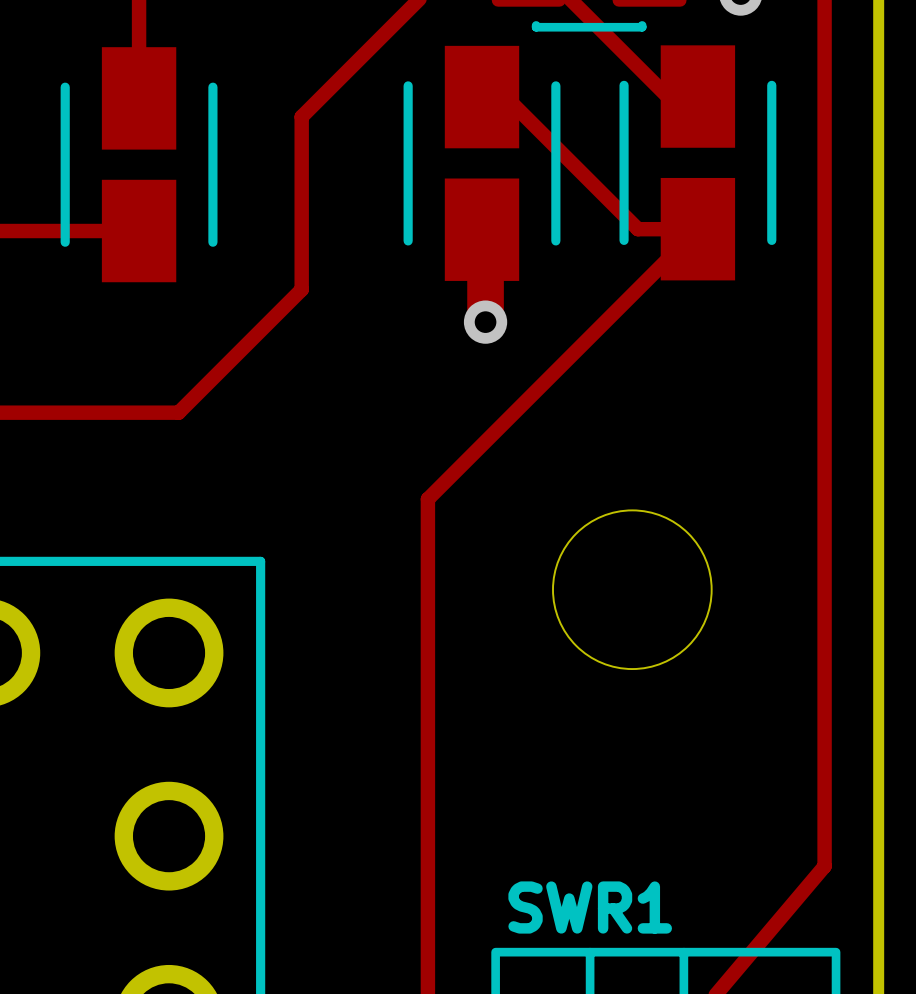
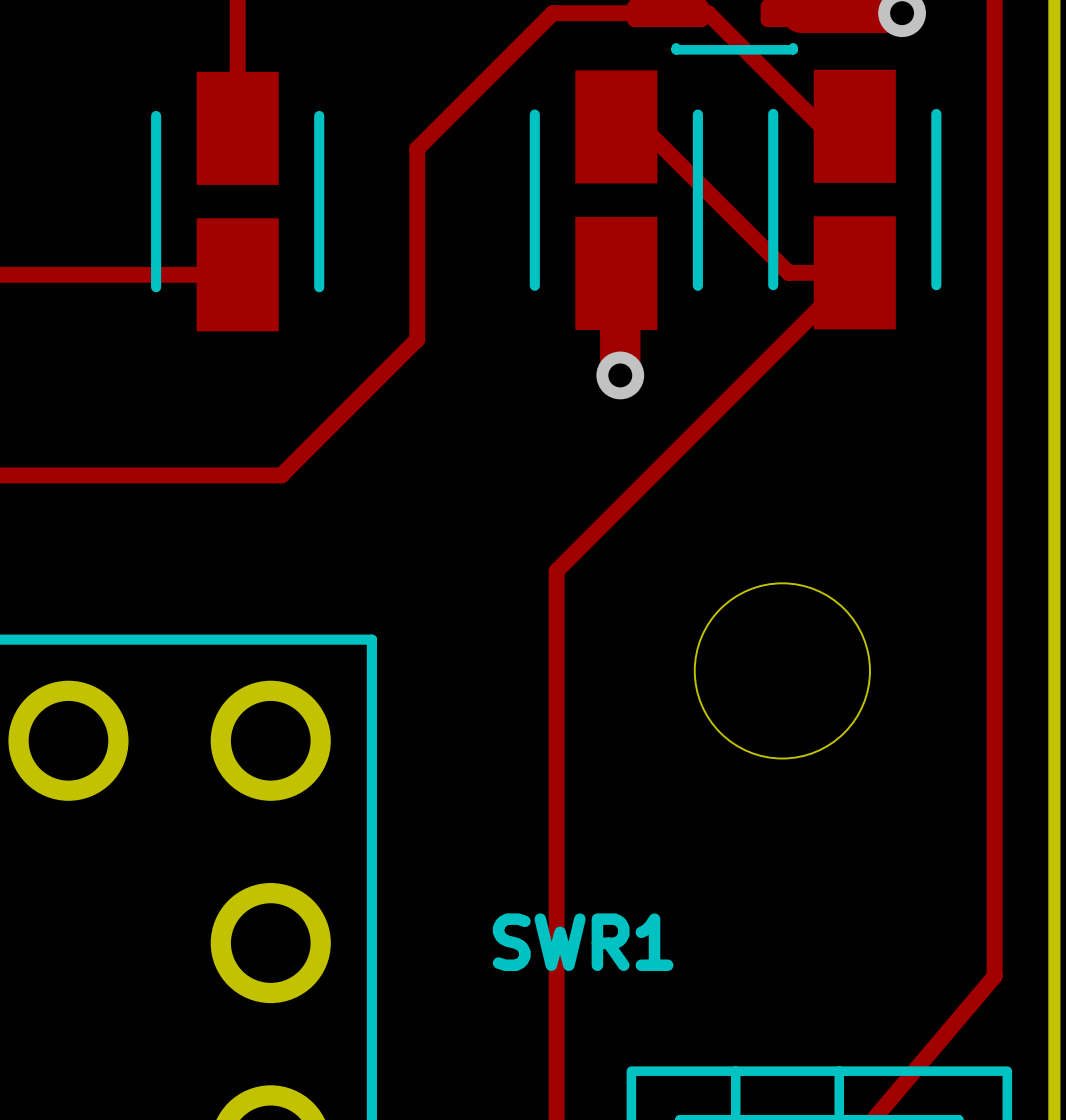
text position: SWR1 (590, 907) -> SWR1 (583, 942)

